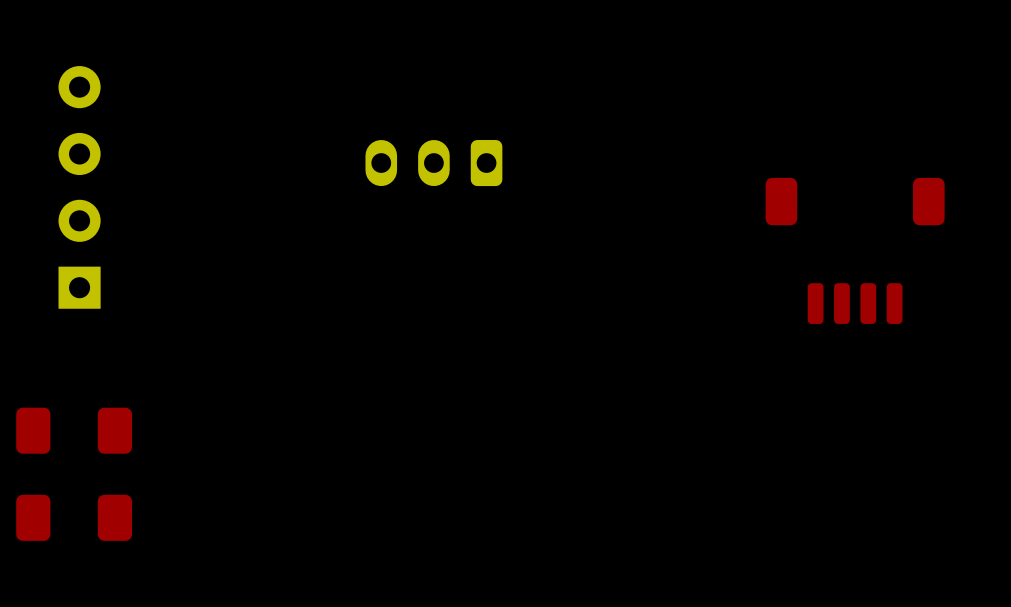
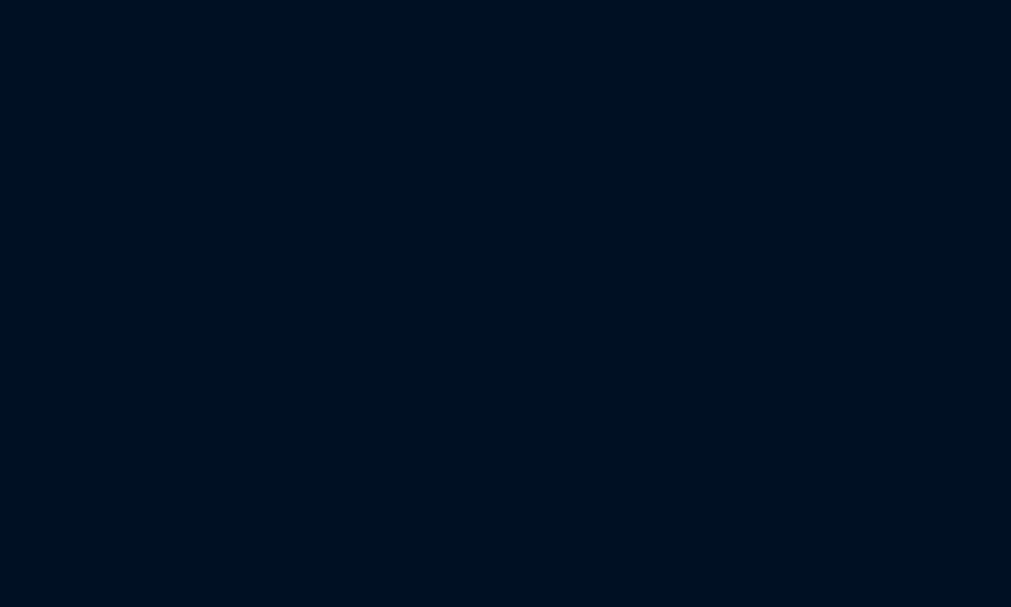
part: (433, 163) -> none
part: (79, 187) -> none
part: (855, 250) -> none
part: (74, 430) -> none
part: (74, 517) -> none

